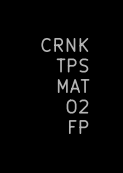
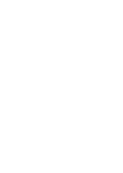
label: CRNK (64, 44) -> none
label: TPS (72, 65) -> none
label: MAT (73, 86) -> none
label: O2 (77, 106) -> none
label: FP (78, 127) -> none

